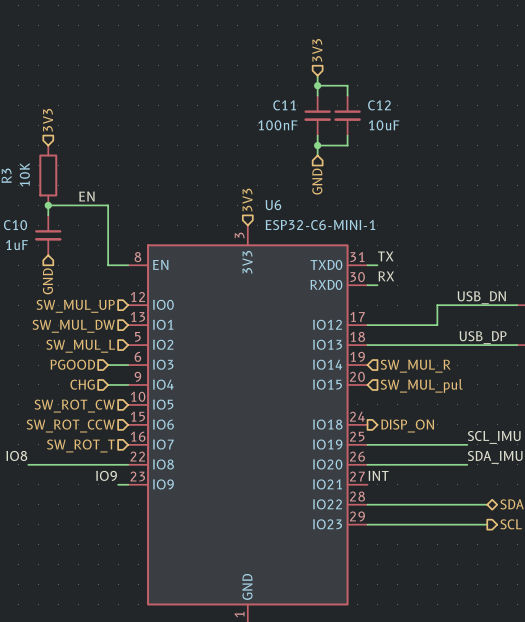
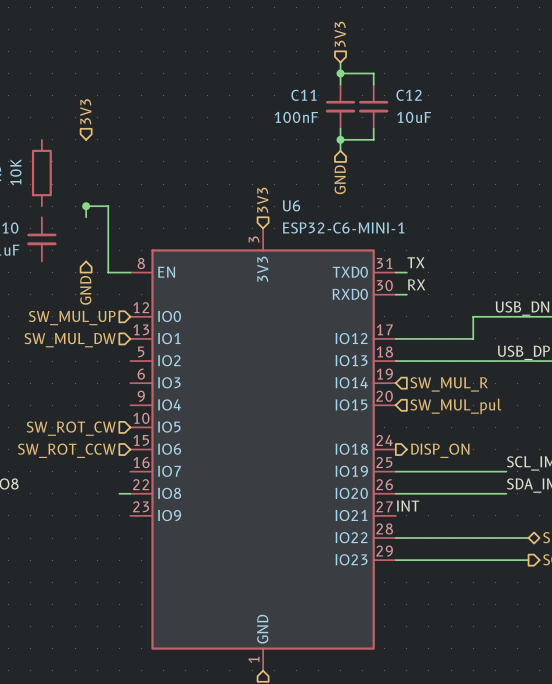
hierarchical label position: 3V3 (47, 120) -> 3V3 (85, 111)
label: EN (86, 196) -> none
junction position: (48, 205) -> (86, 206)
wire: (88, 205) (48, 205) (48, 215) -> (86, 206) (86, 217)
hierarchical label position: GND (47, 281) -> GND (85, 290)
hierarchical label: SW_MUL_L (80, 346) -> none
hierarchical label: PGOOD (72, 364) -> none
wire: (108, 365) (128, 365) -> none
hierarchical label: CHG (82, 384) -> none
wire: (108, 384) (128, 384) -> none
hierarchical label: SW_ROT_T (80, 445) -> none
wire: (28, 464) (118, 464) -> none
label: IO9 (106, 475) -> none
wire: (118, 484) (128, 484) -> none

